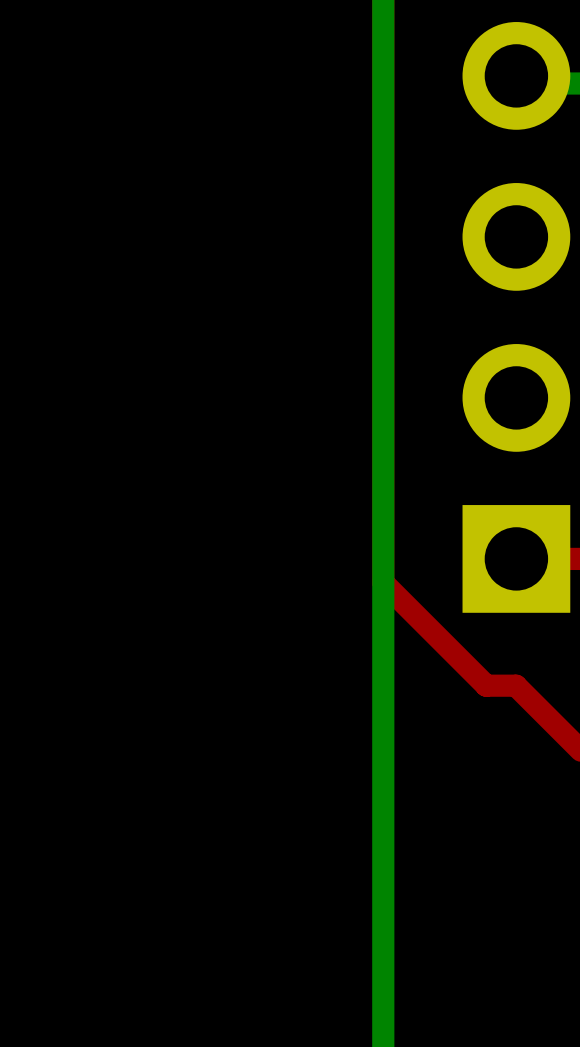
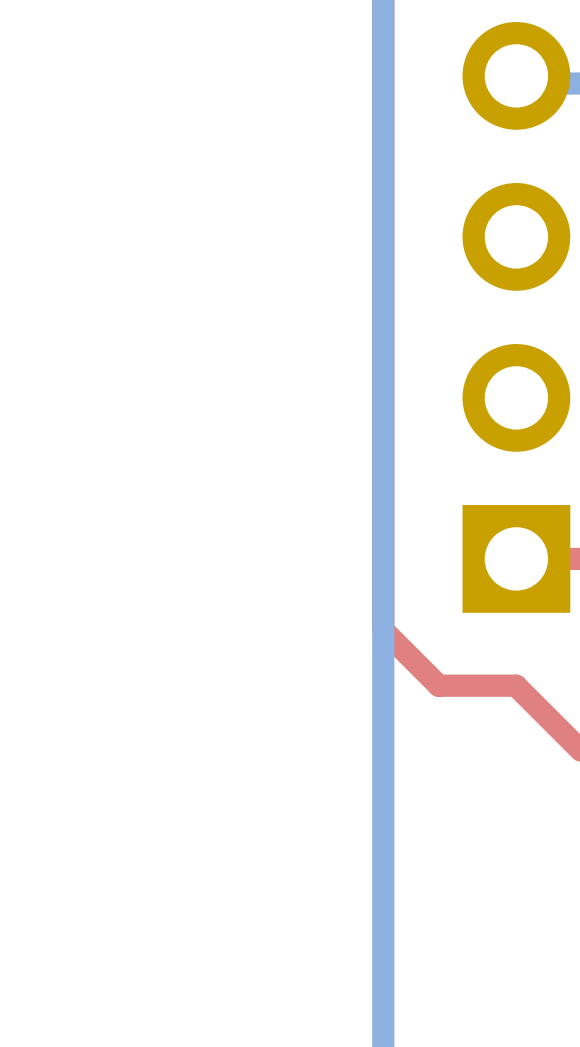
top track: (383, 582) (486, 685) -> (383, 582) (383, 630) (438, 685) (486, 685)

